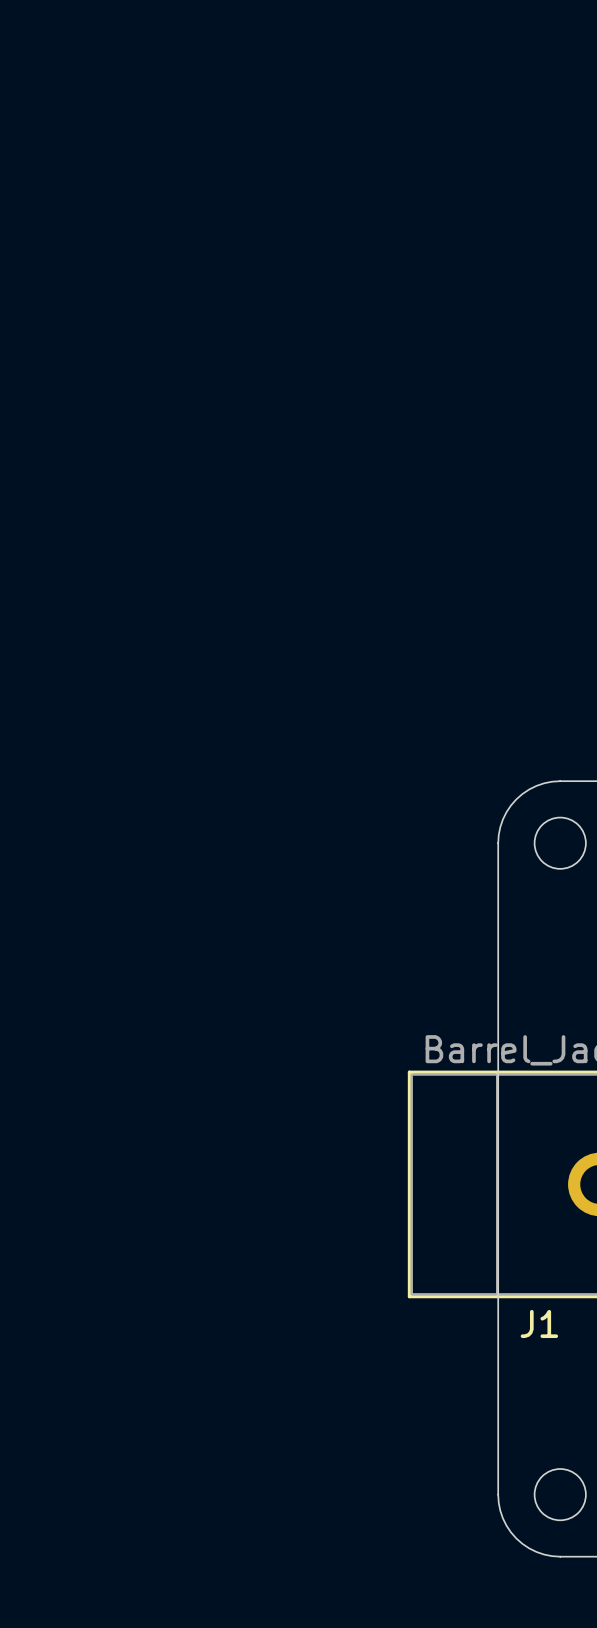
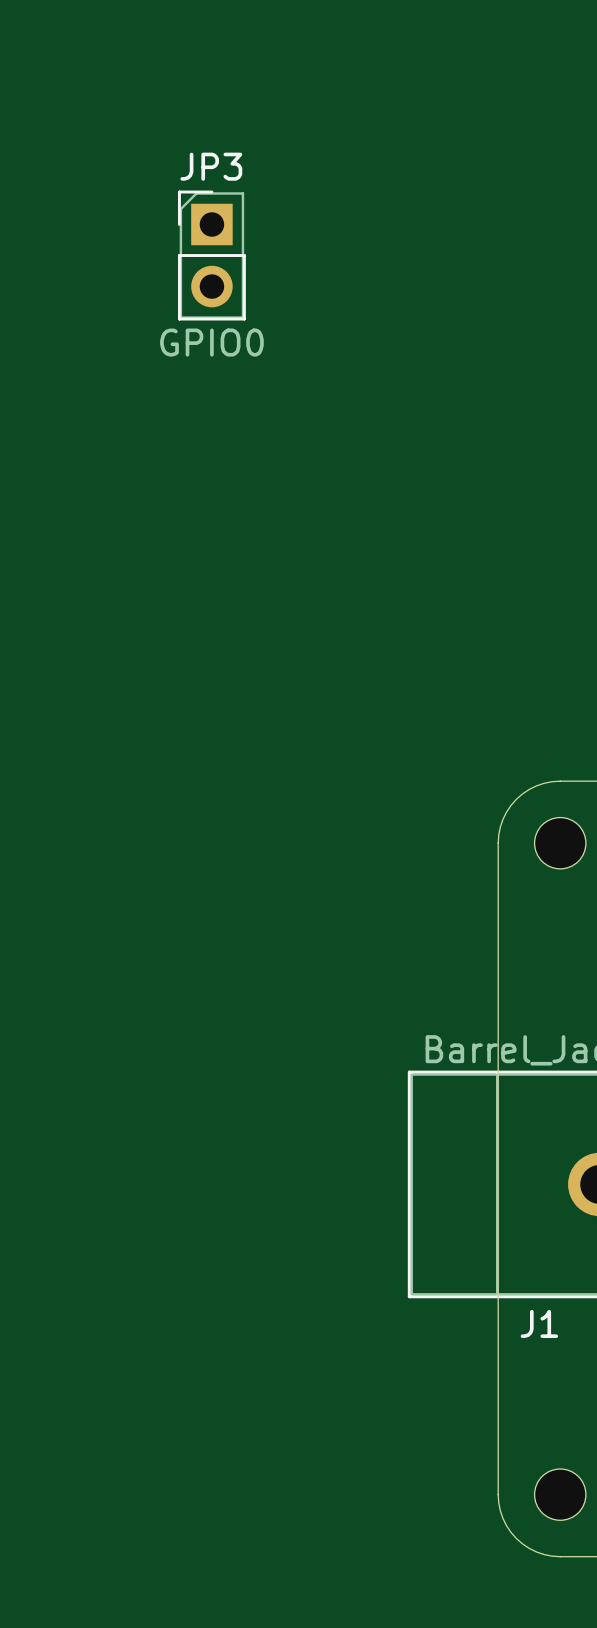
JP3: none -> GPIO0 (211, 255)

